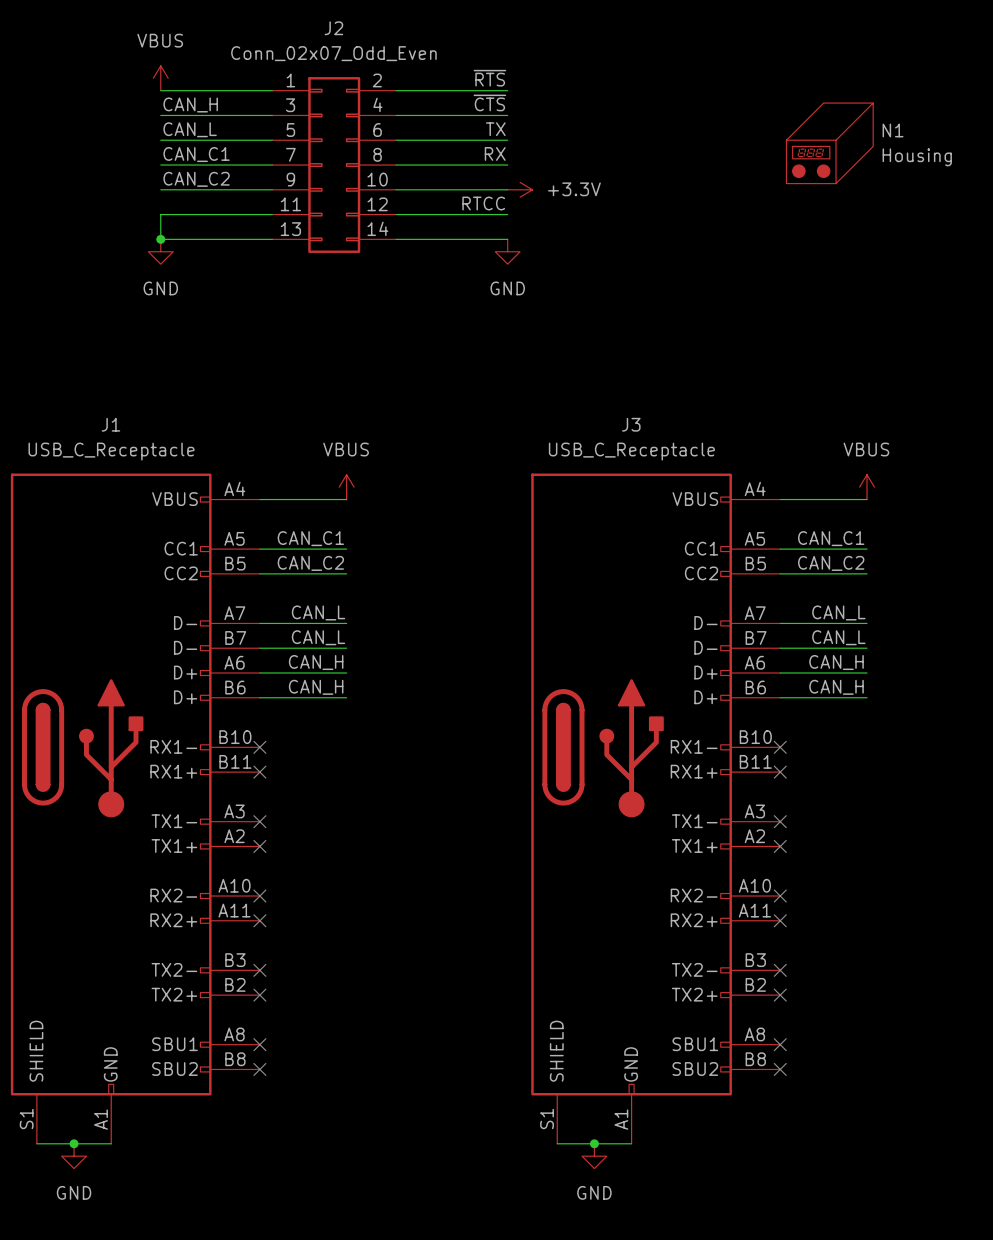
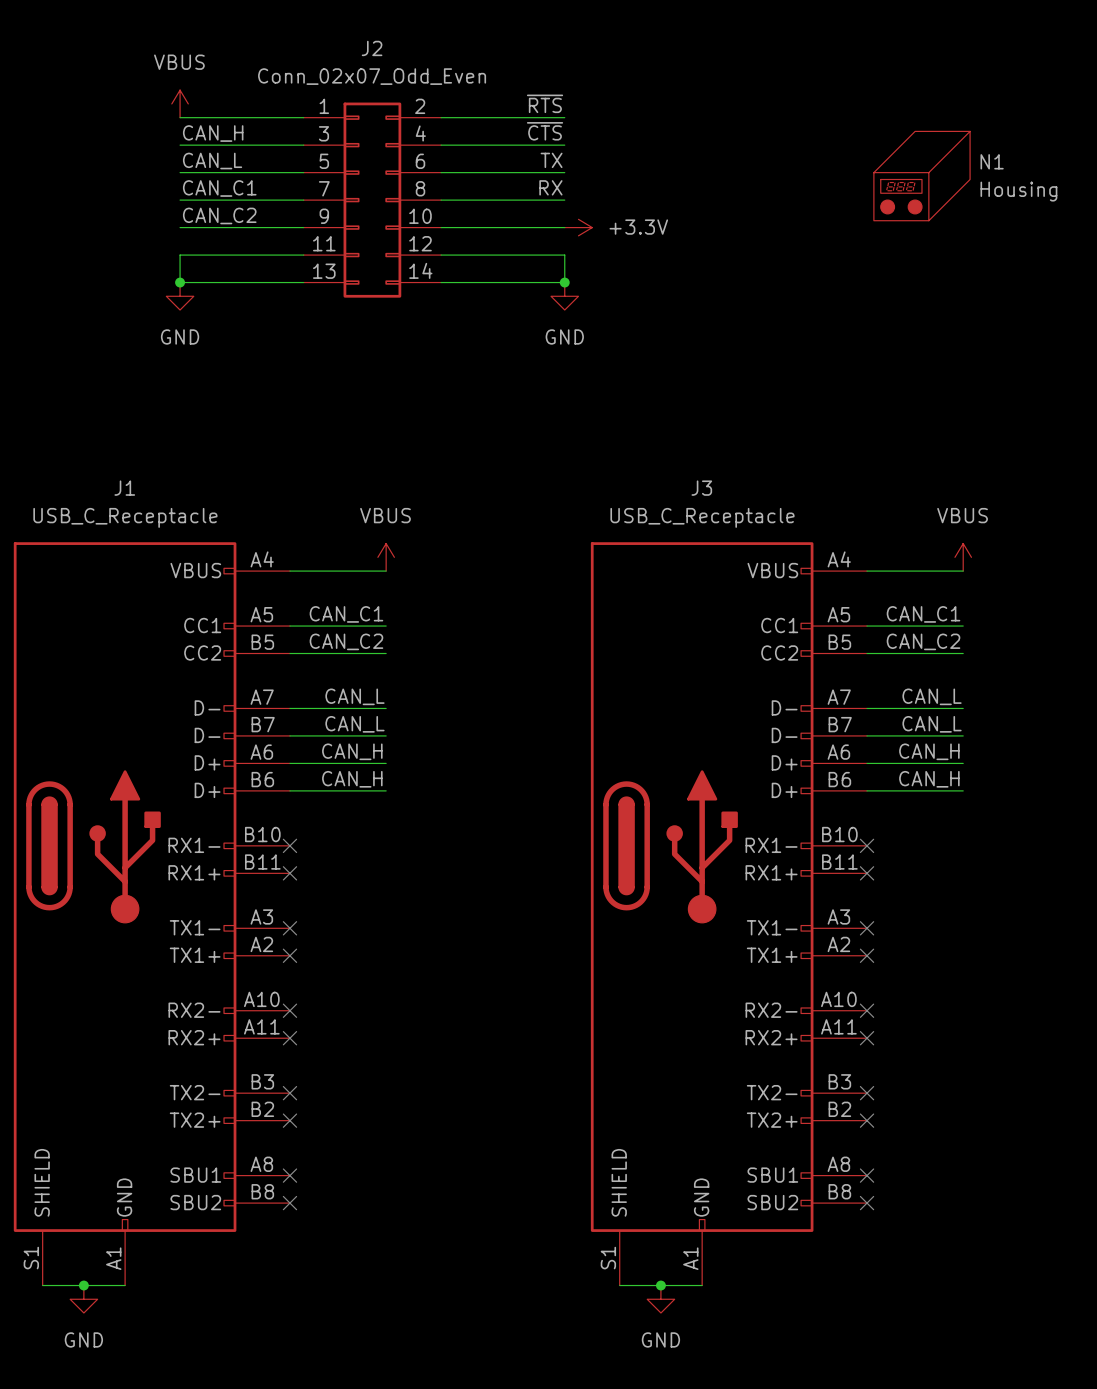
label: RTCC (483, 203) -> none
wire: none -> (564, 255) (564, 282)
junction: none -> (564, 282)

